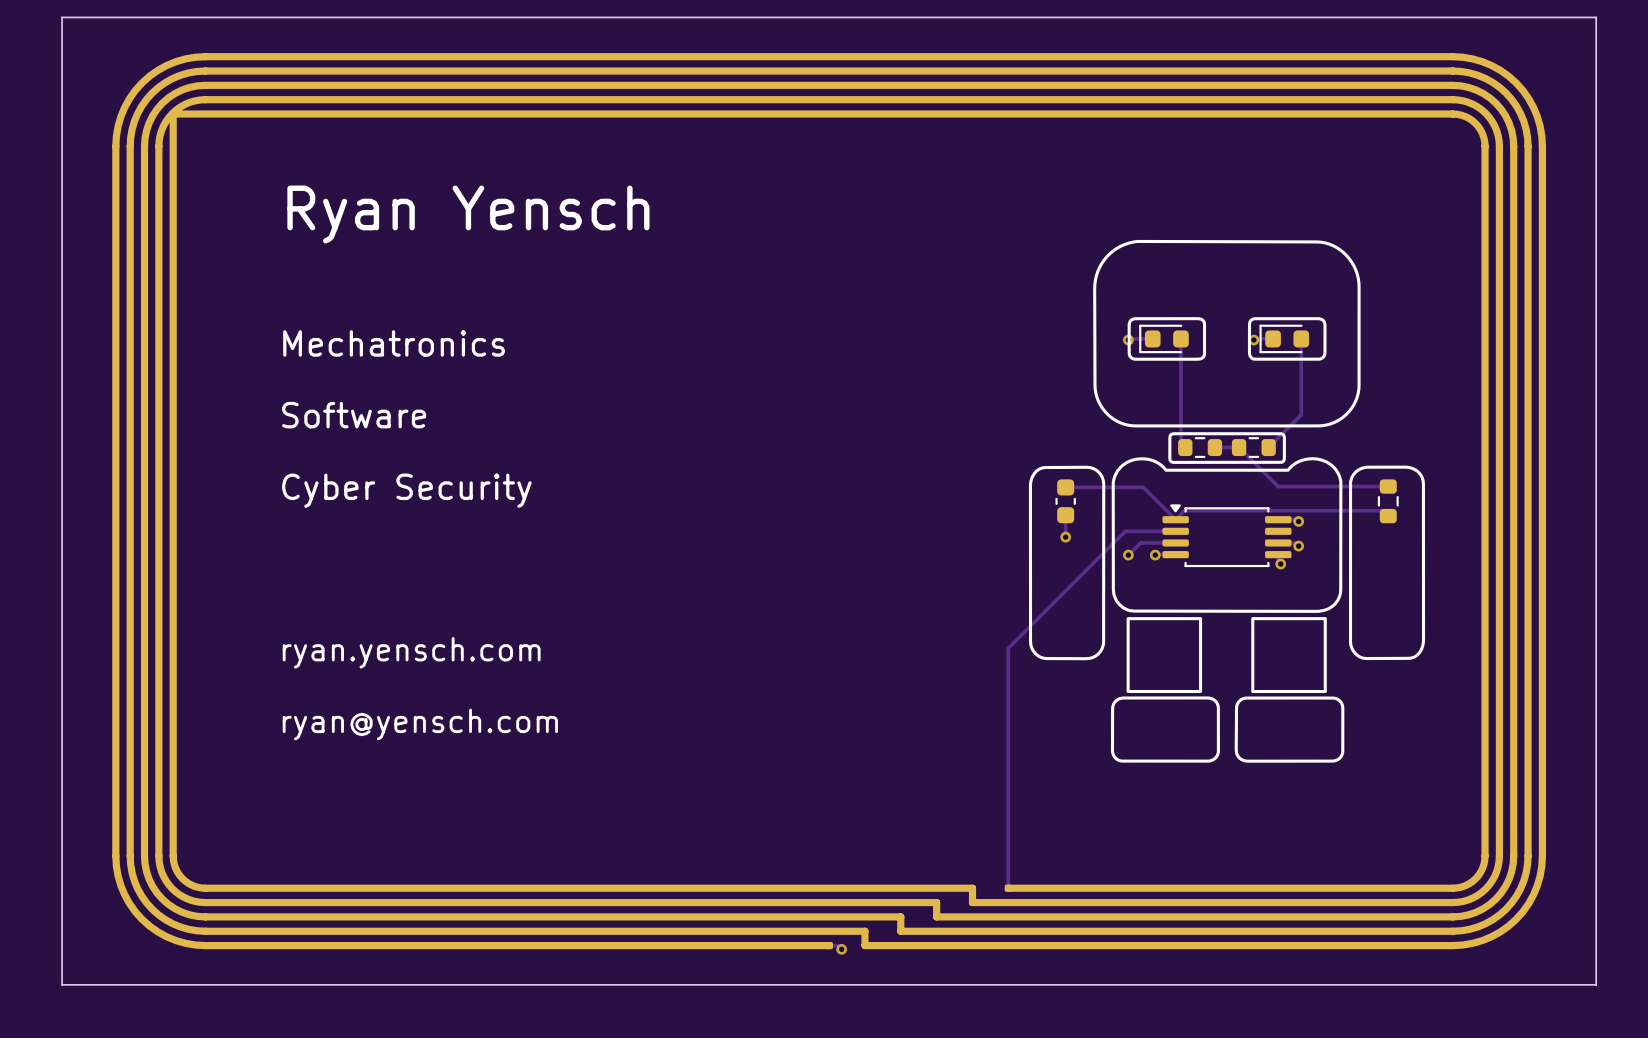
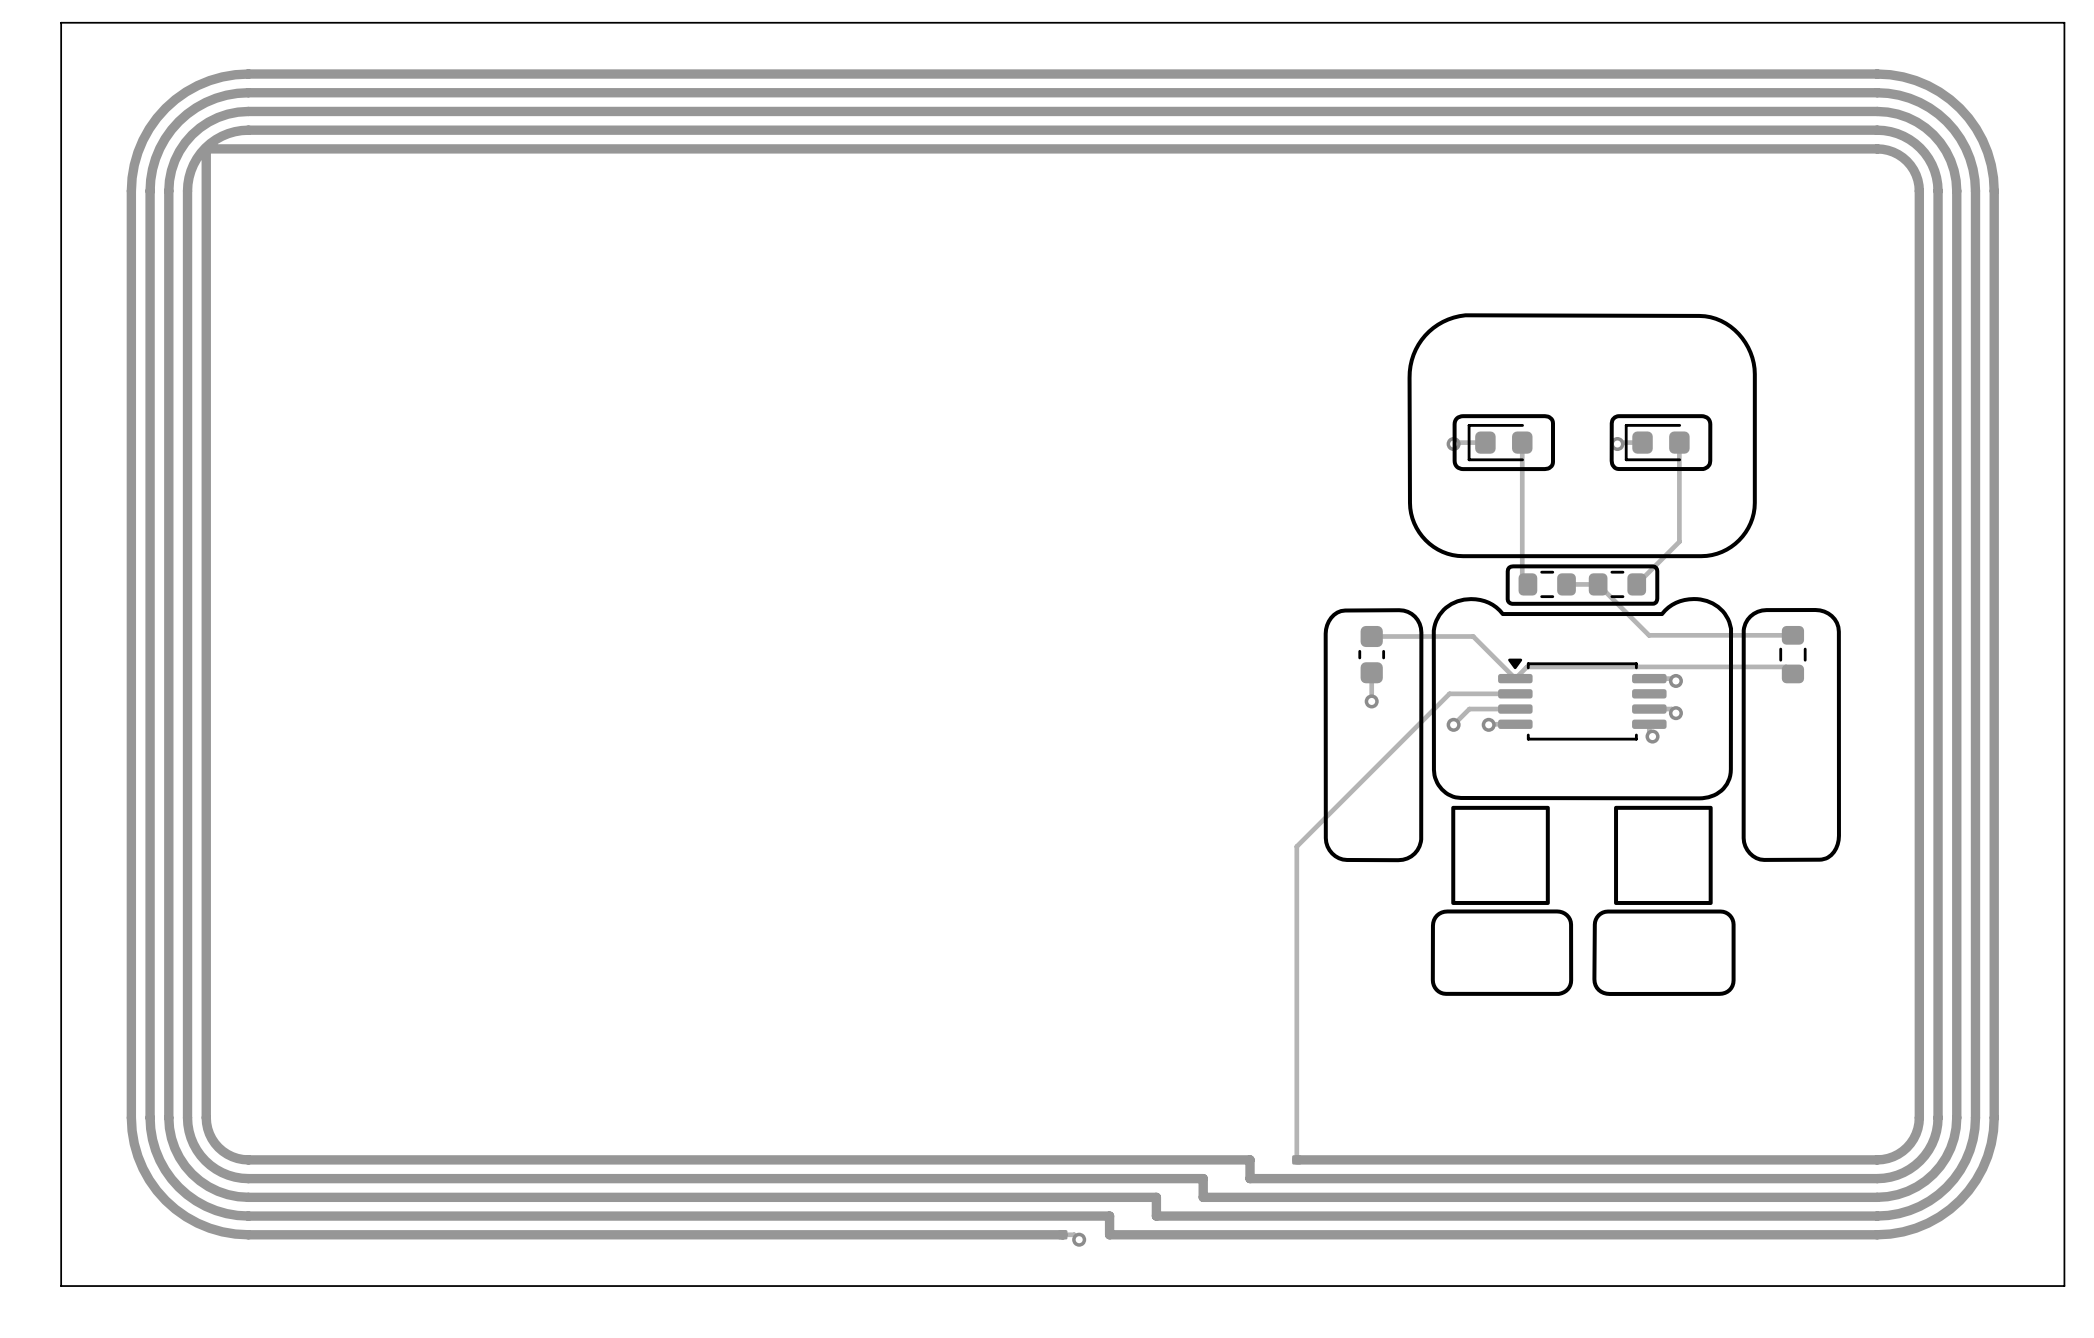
text: Ryan Yensch (468, 214) -> none
text: Mechatronics (394, 343) -> none
text: Software (354, 415) -> none
text: Cyber Security (406, 490) -> none
text: ryan.yensch.com (411, 652) -> none
text: ryan@yensch.com (420, 724) -> none

